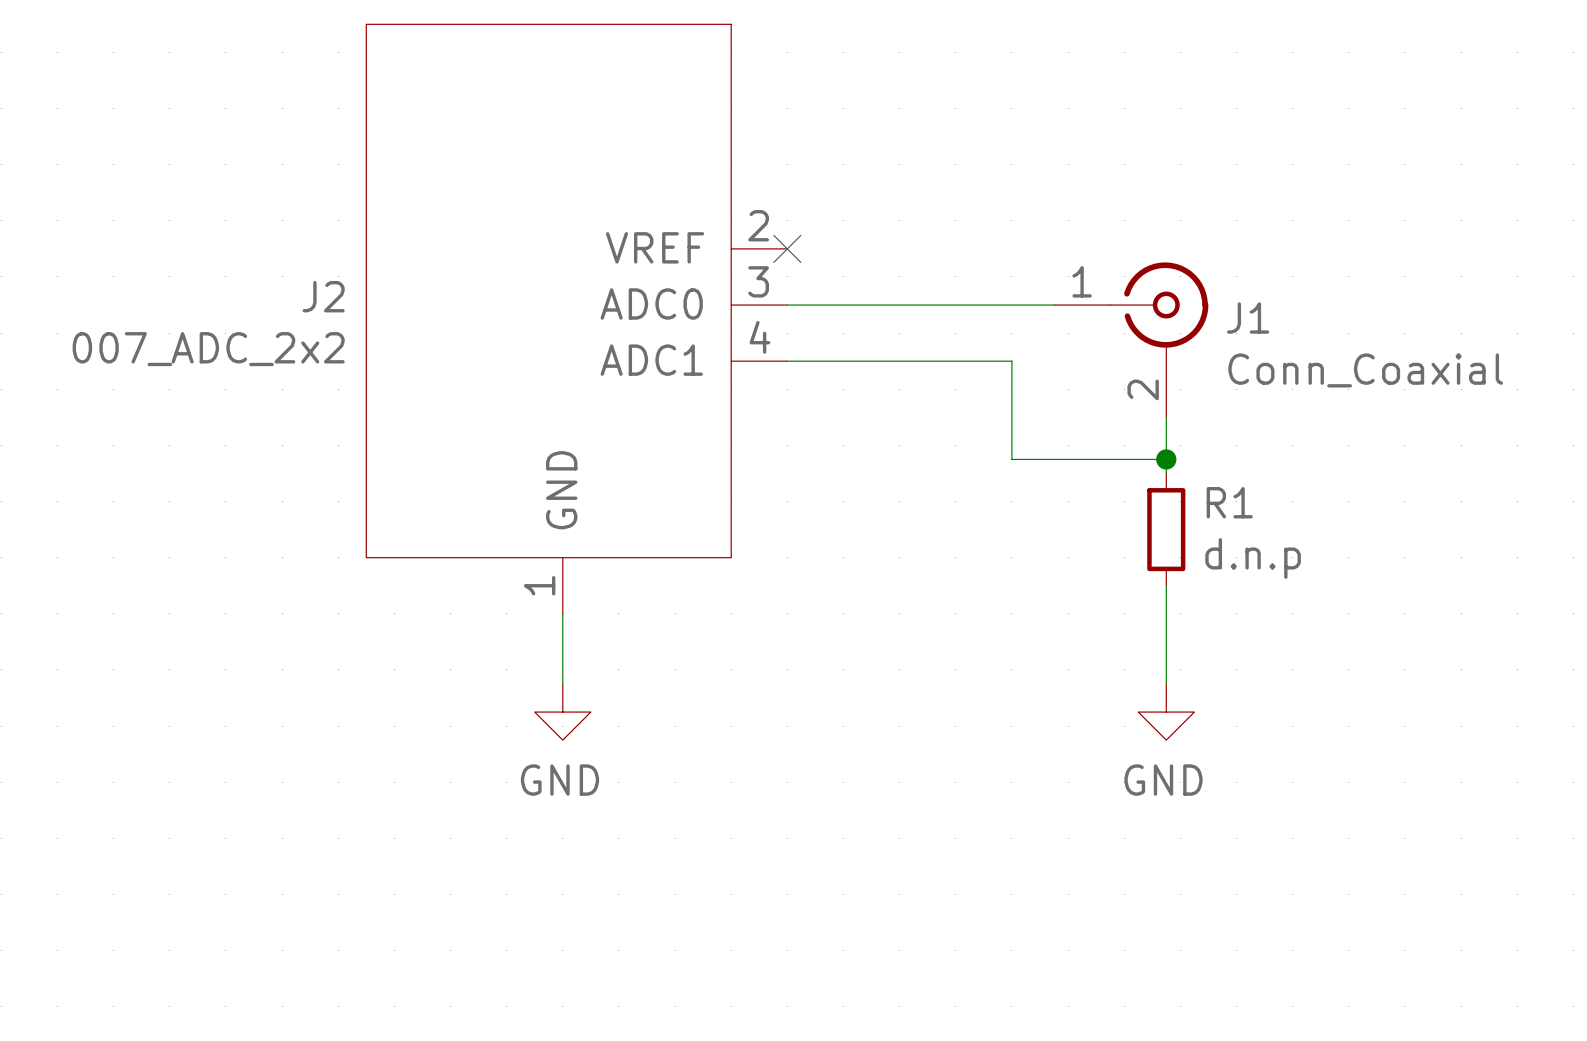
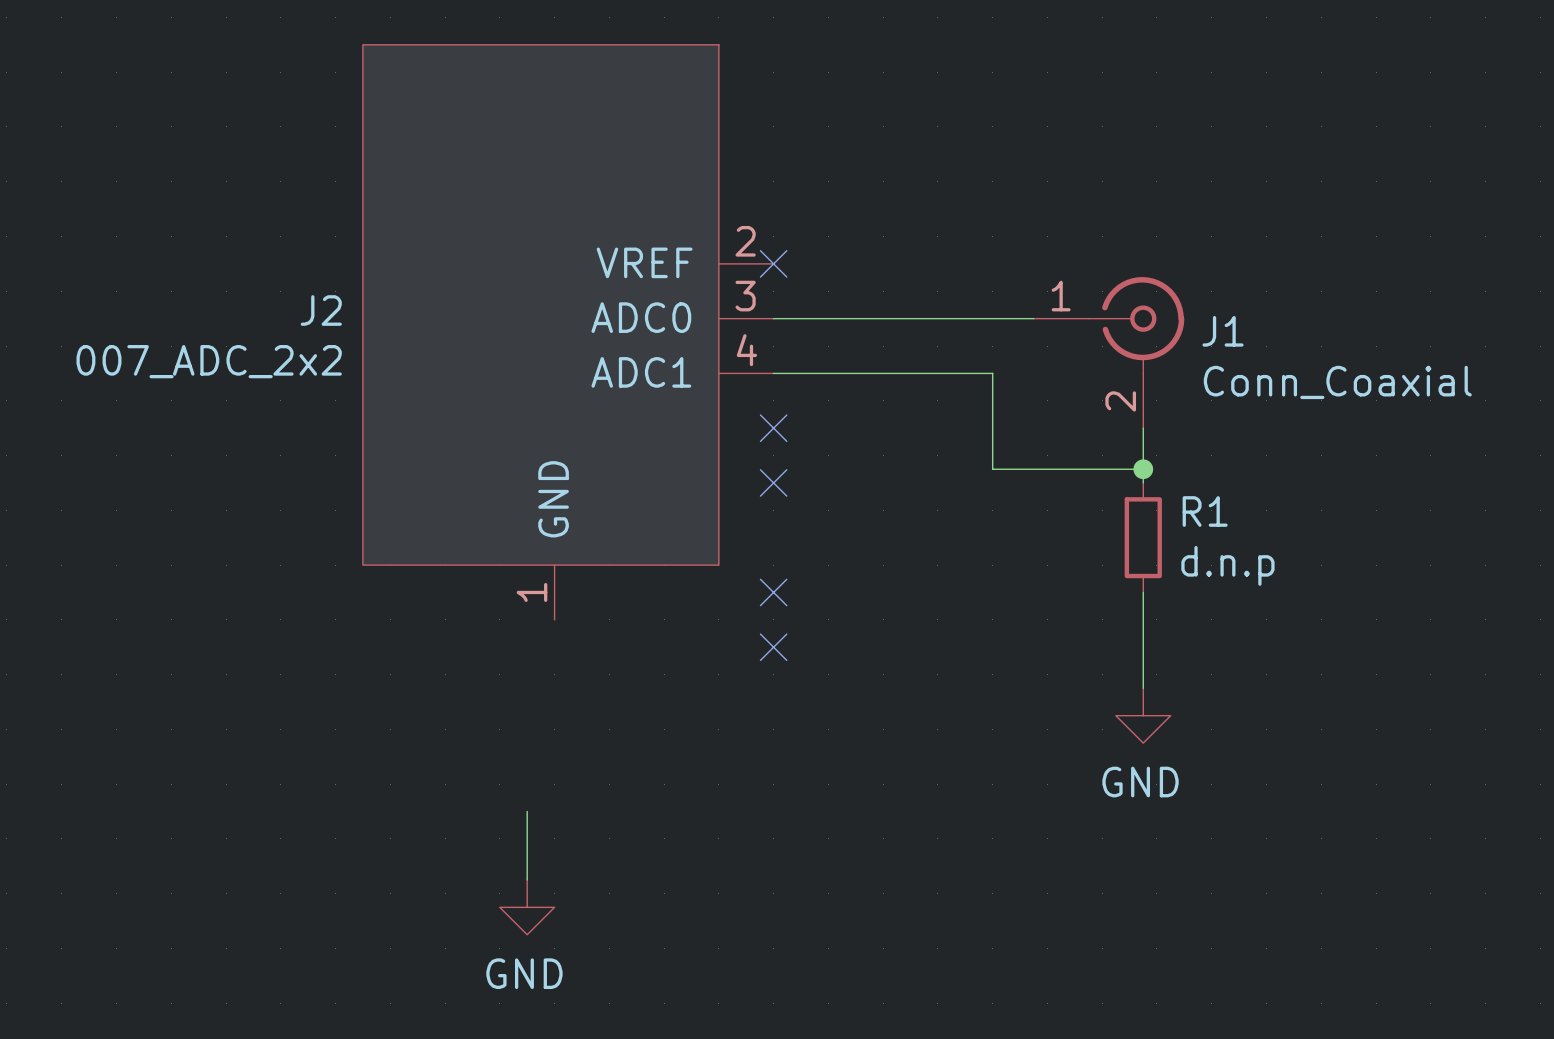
no-connect mark: none -> (773, 428)
no-connect mark: none -> (773, 482)
no-connect mark: none -> (773, 592)
wire: (562, 613) (562, 683) -> (527, 811) (527, 879)
no-connect mark: none -> (773, 647)
power symbol position: GND (562, 712) -> GND (527, 907)

